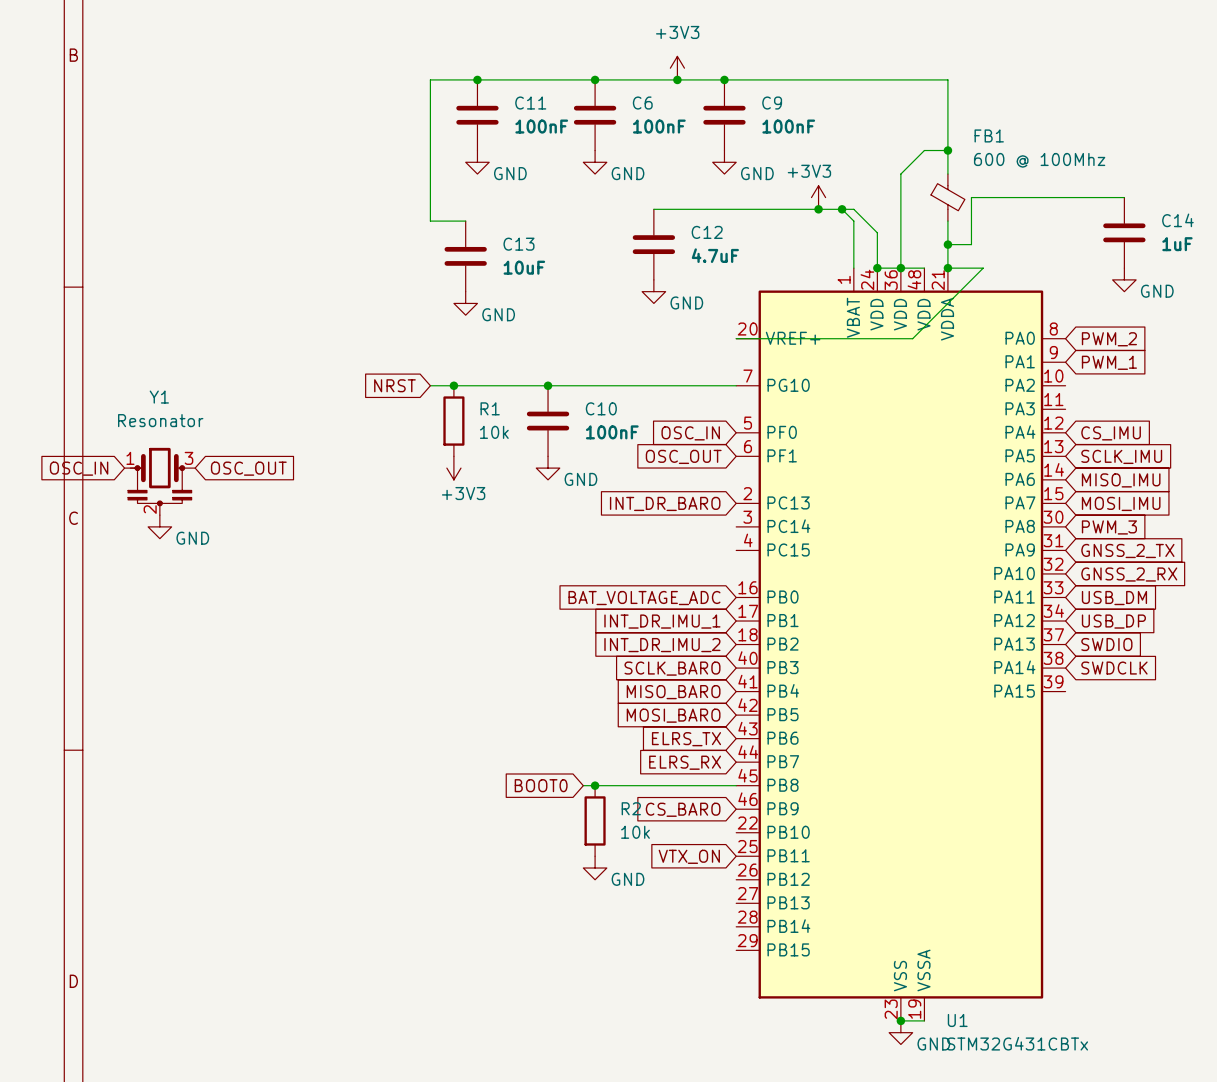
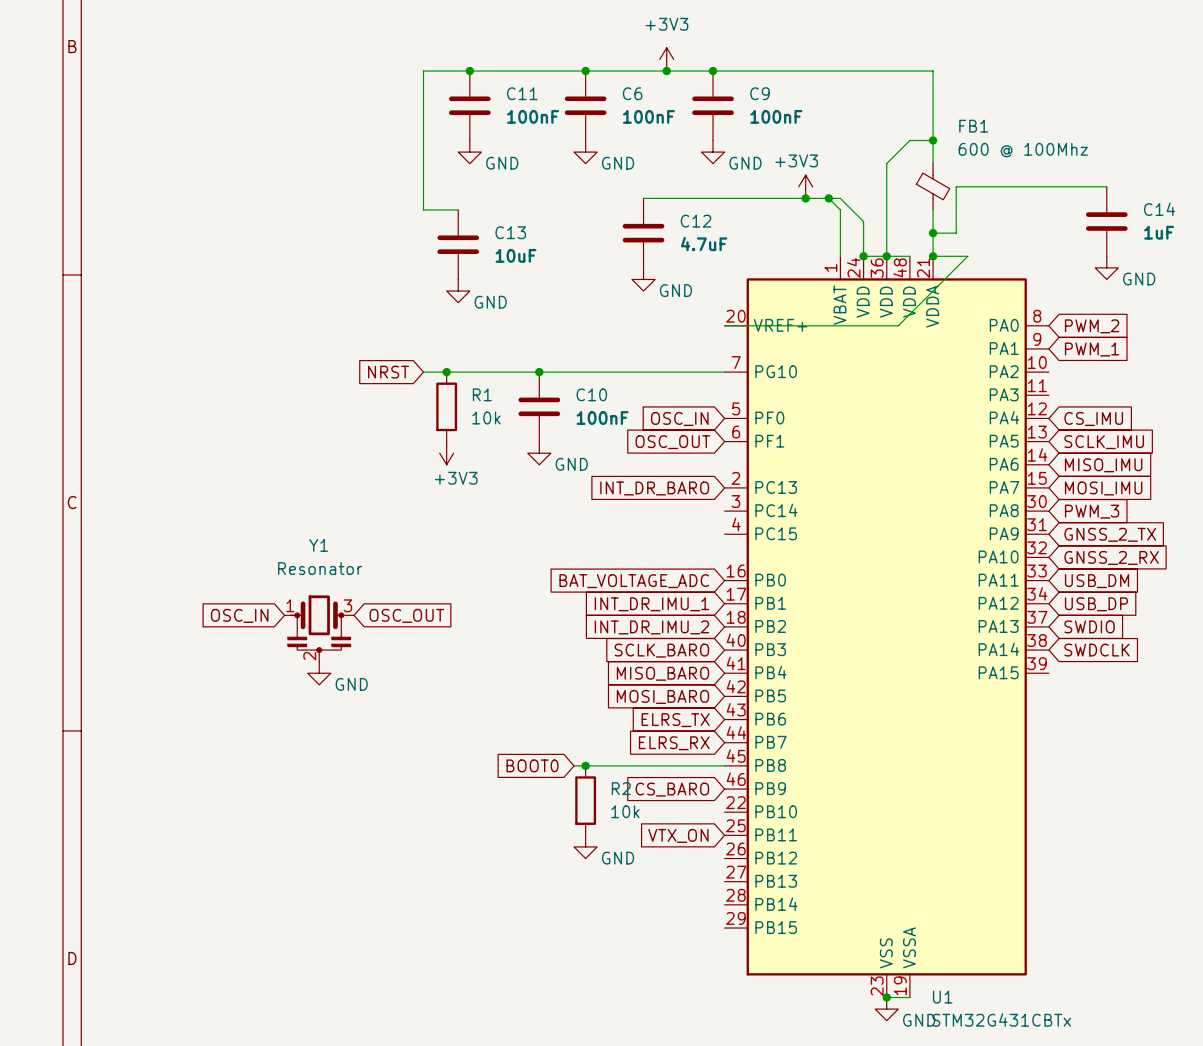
global label: OSC_IN (79, 468) -> none
global label: OSC_OUT (248, 468) -> none
Y1 position: (159, 481) -> (319, 628)
power symbol: GND (159, 526) -> none
global label: none -> OSC_IN (239, 615)
global label: none -> OSC_OUT (406, 615)
power symbol: none -> GND (319, 673)

